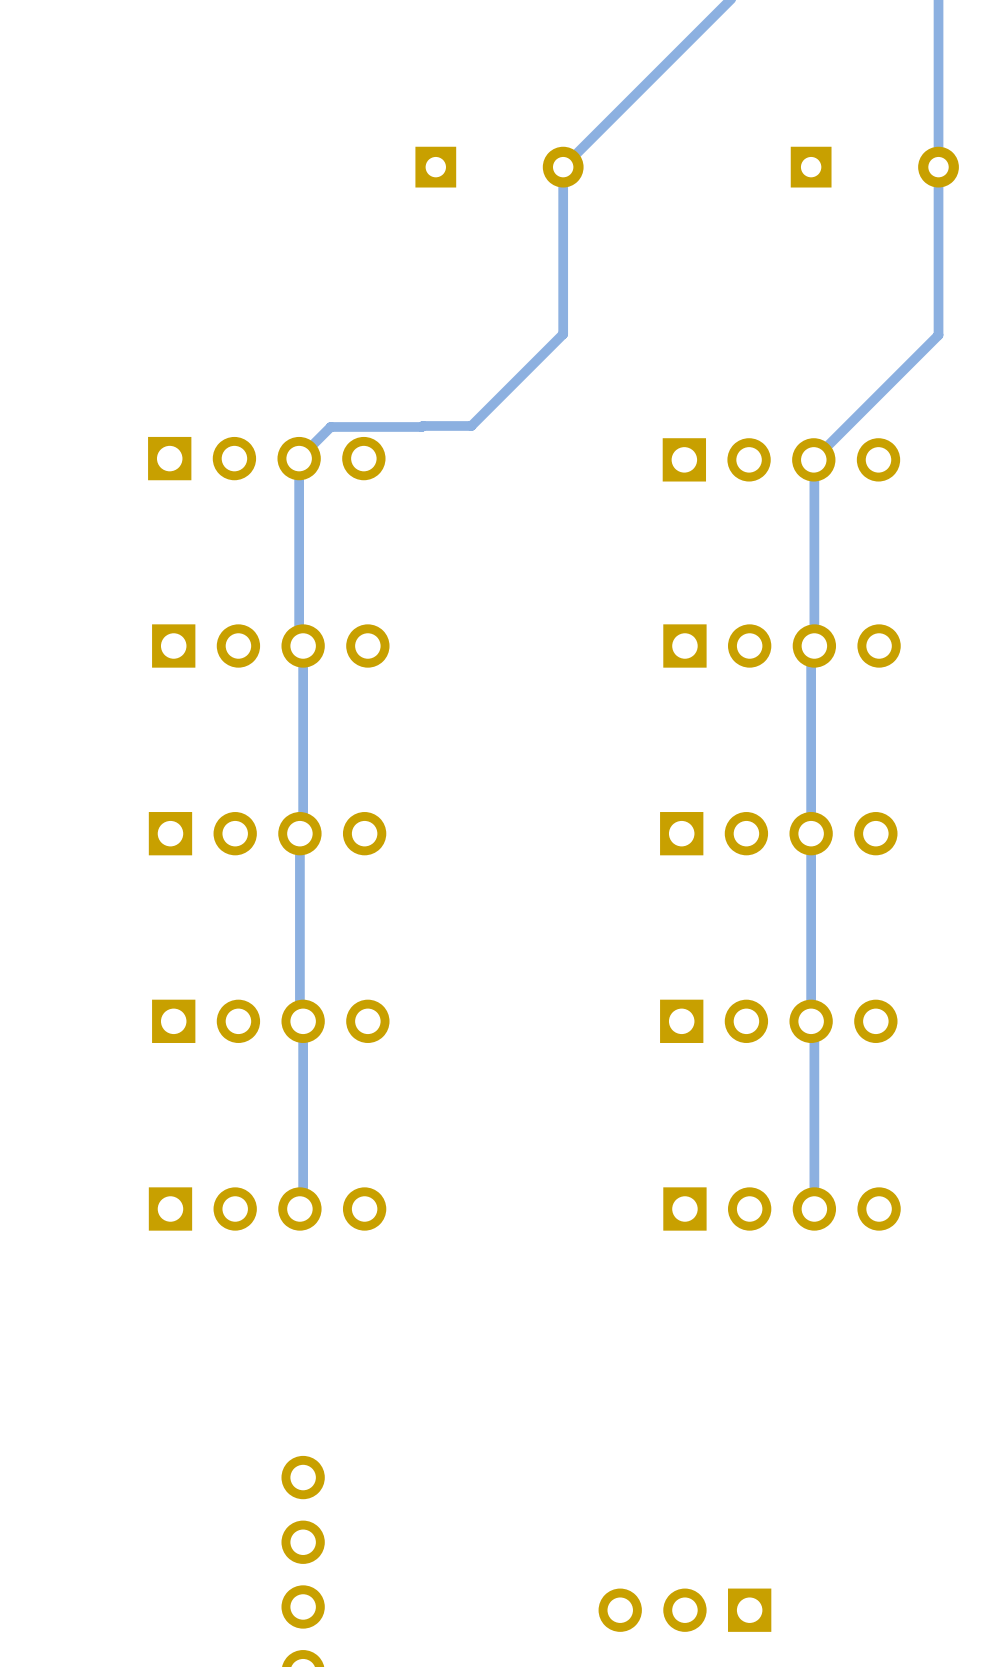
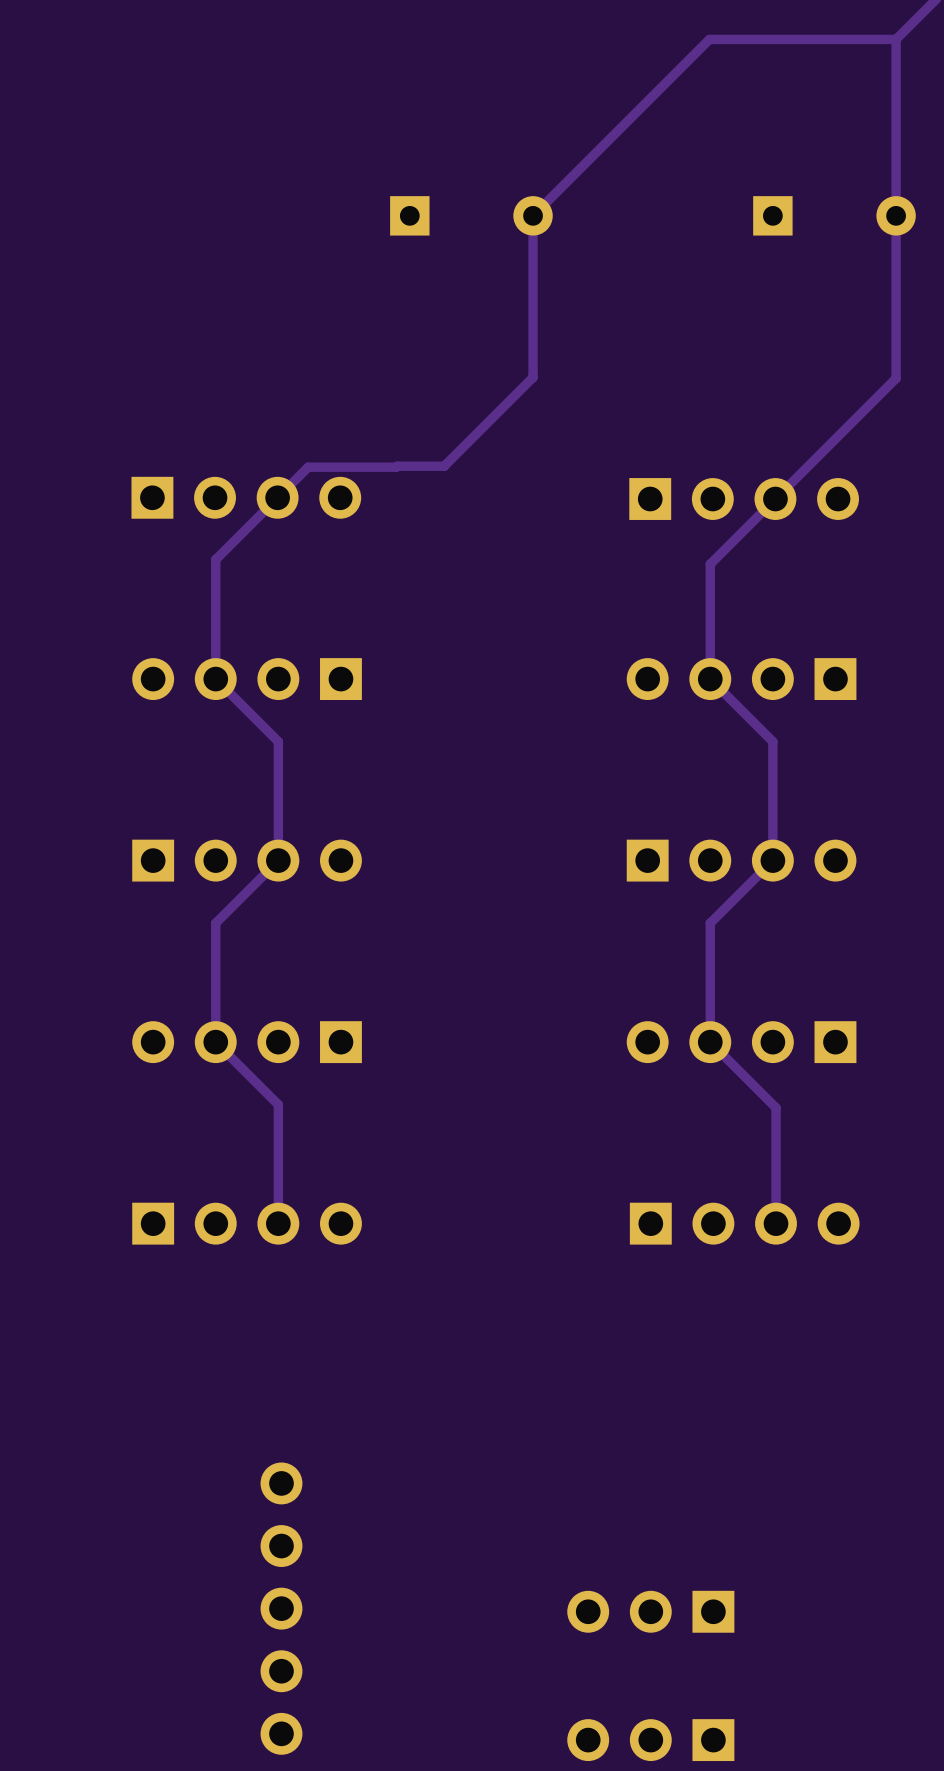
track: (299, 458) (299, 642) (303, 646) (303, 830) (299, 833) (299, 1018) (303, 1021) (303, 1205) (299, 1209) -> (277, 497) (215, 559) (215, 679) (278, 741) (278, 860) (215, 923) (215, 1042) (278, 1104) (278, 1223)
track: (813, 459) (814, 646) (811, 649) (811, 710) -> (775, 499) (710, 564) (710, 679) (772, 741)
part rotation: 0° (270, 646) -> 180° (247, 679)
part rotation: 0° (782, 646) -> 180° (741, 679)
track: (811, 833) (811, 1021) (814, 1024) (814, 1089) -> (772, 860) (710, 923) (710, 1042) (776, 1107)
part rotation: 0° (270, 1021) -> 180° (247, 1042)
part rotation: 0° (778, 1021) -> 180° (741, 1042)

